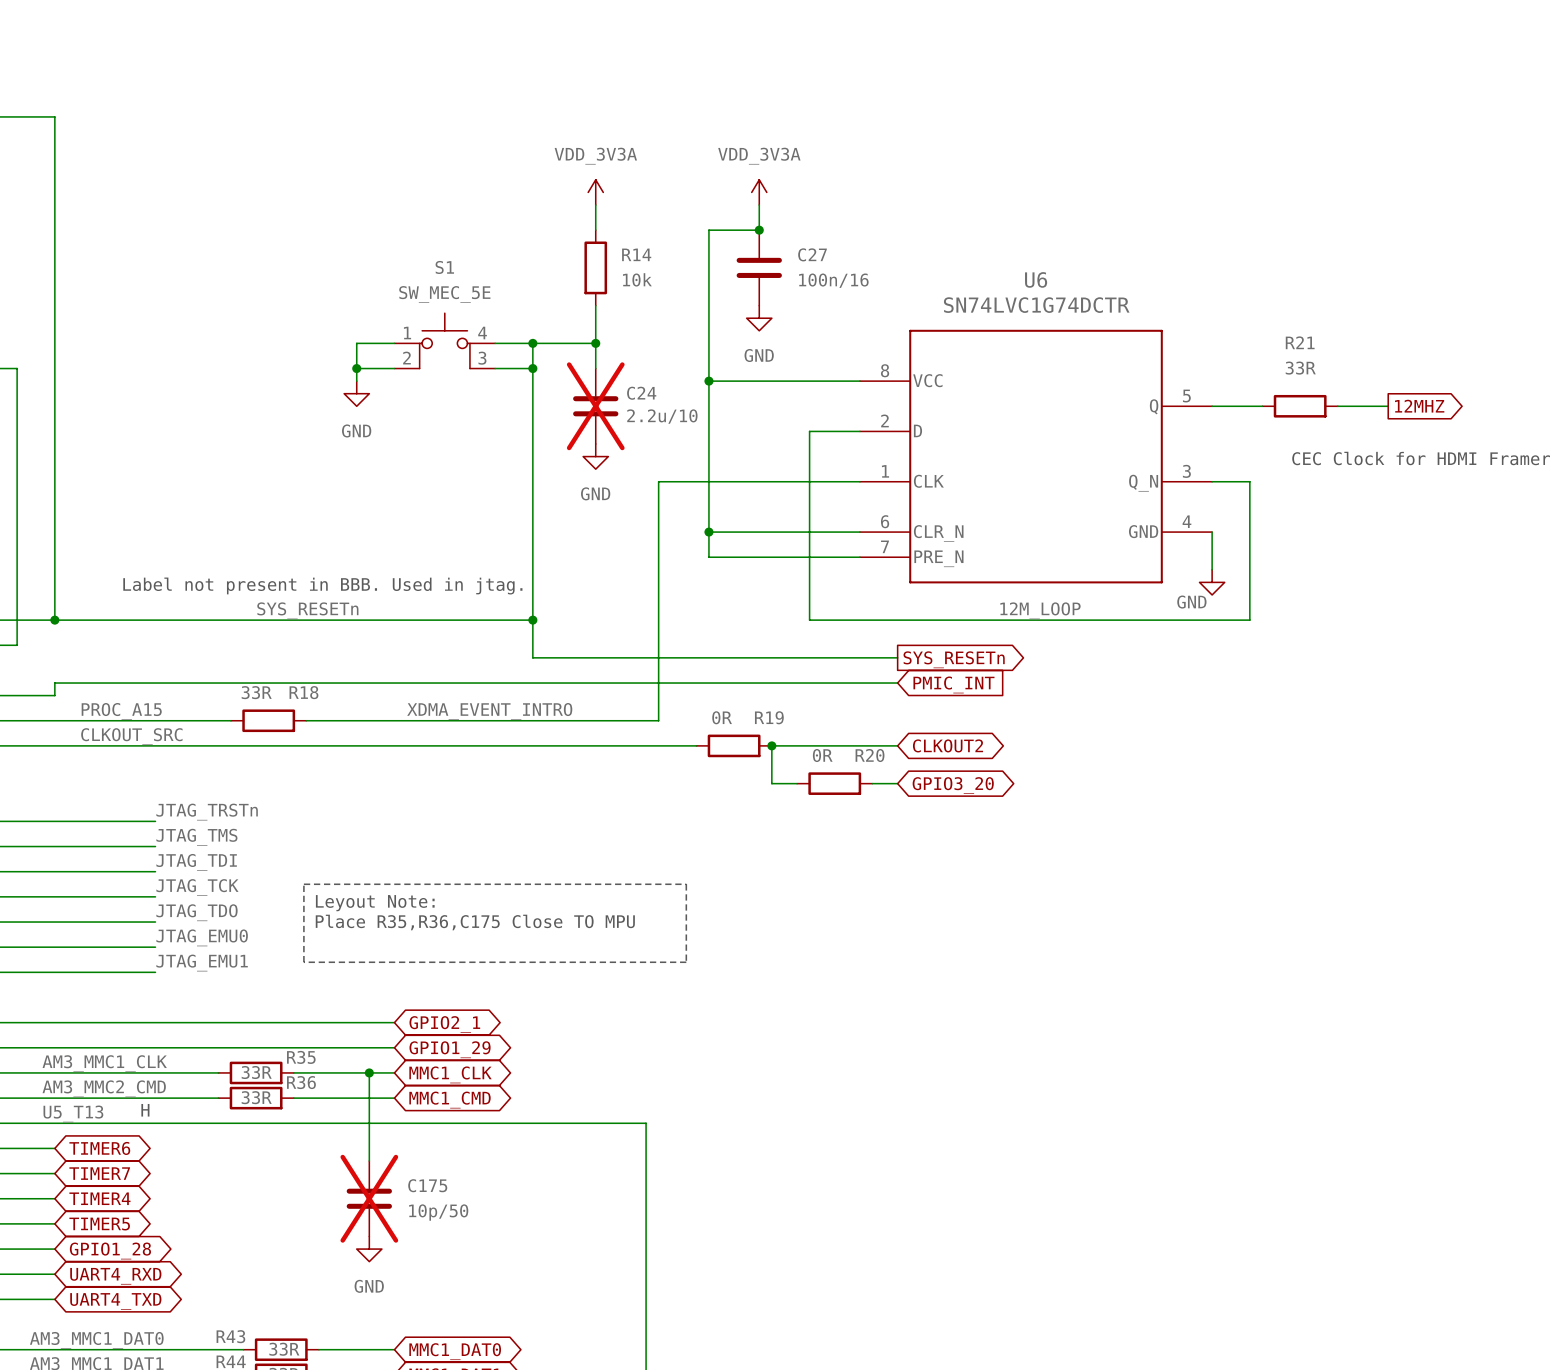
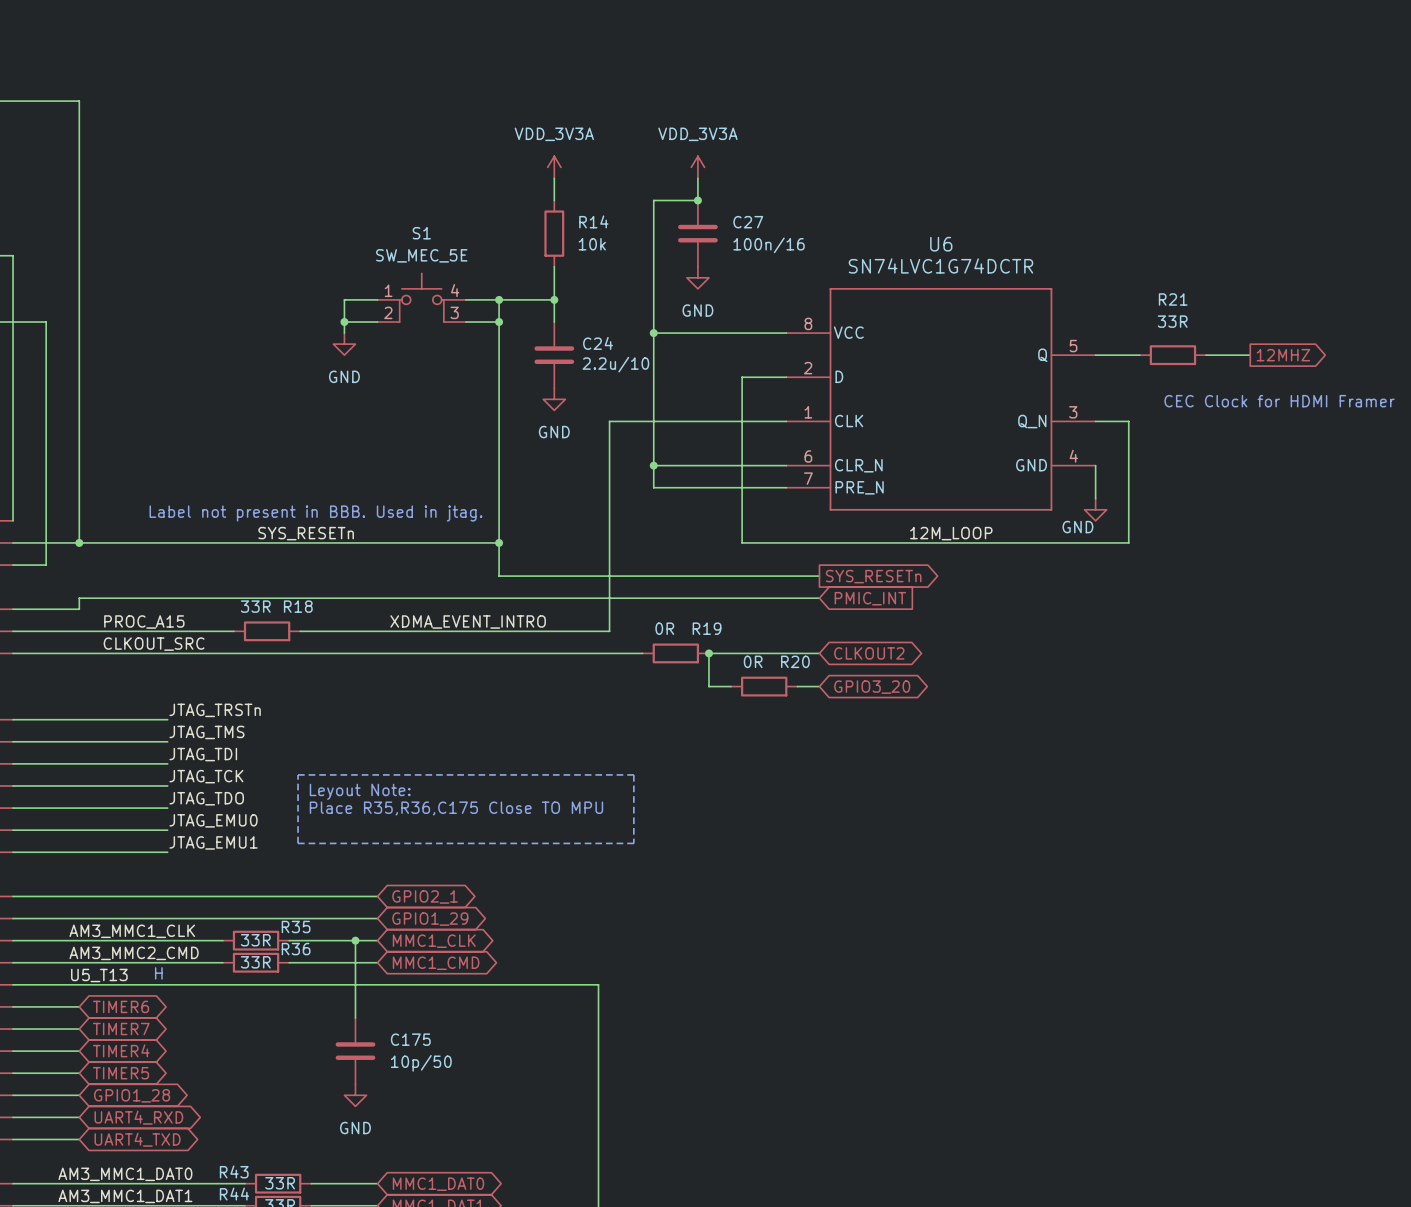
C24 do-not-place cross: (595, 406) -> none
C175 do-not-place cross: (369, 1198) -> none

